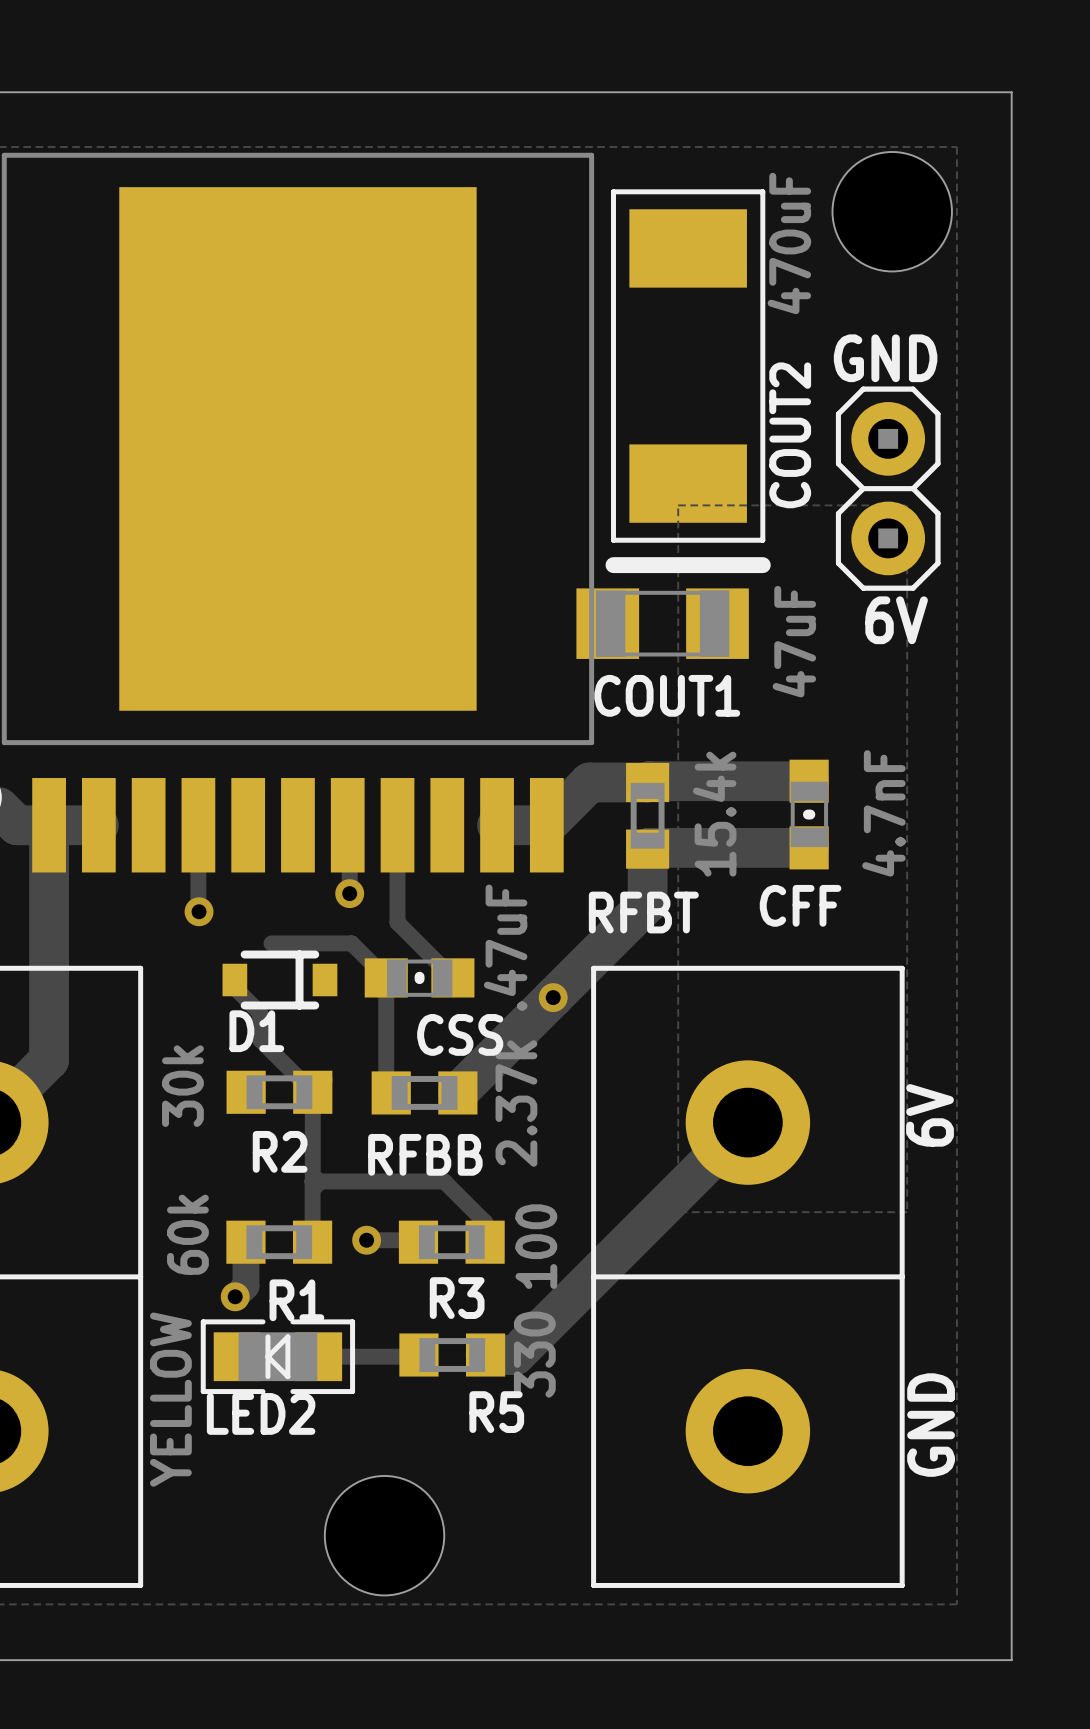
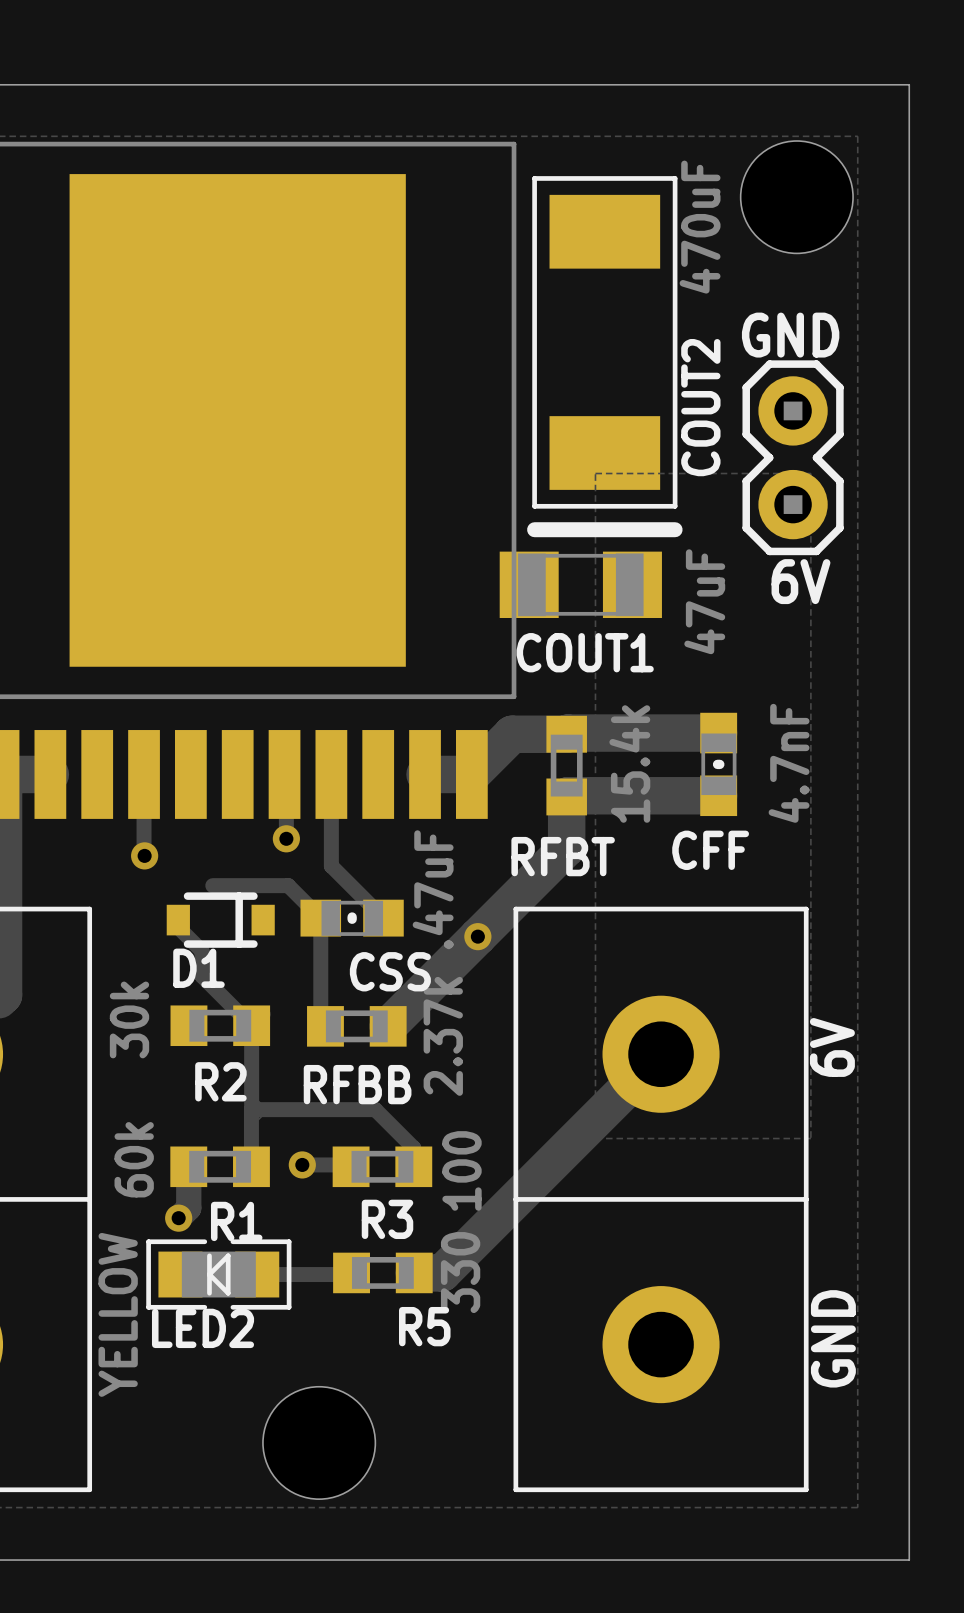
part footprint: [835, 386, 941, 591] -> [742, 360, 844, 556]

